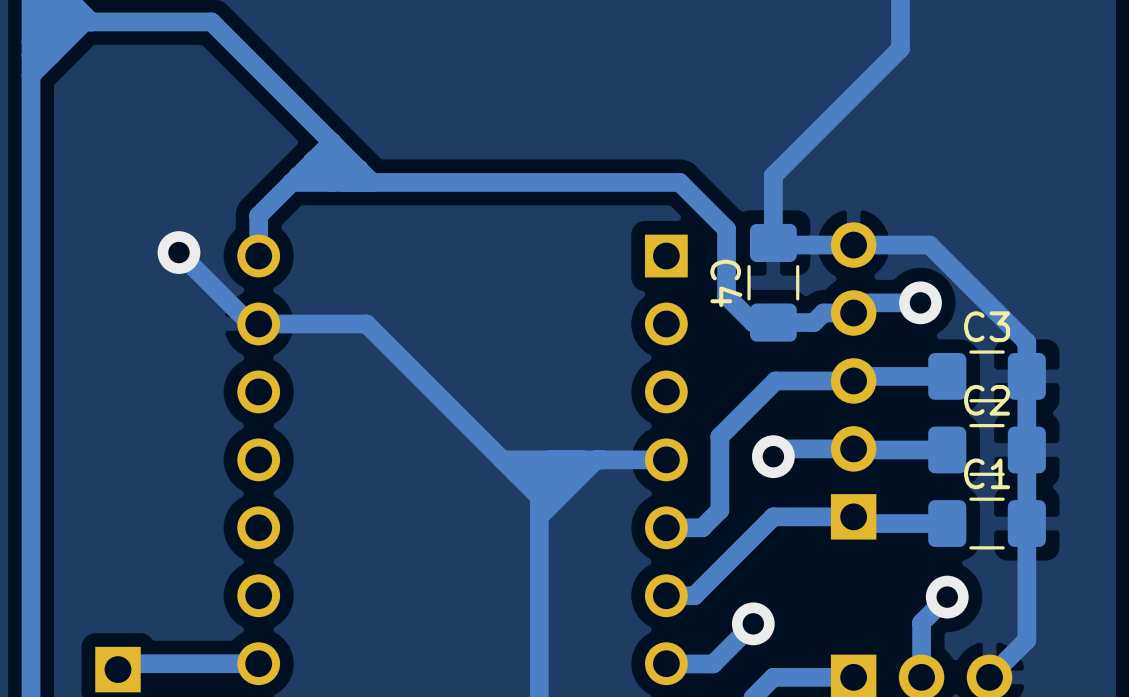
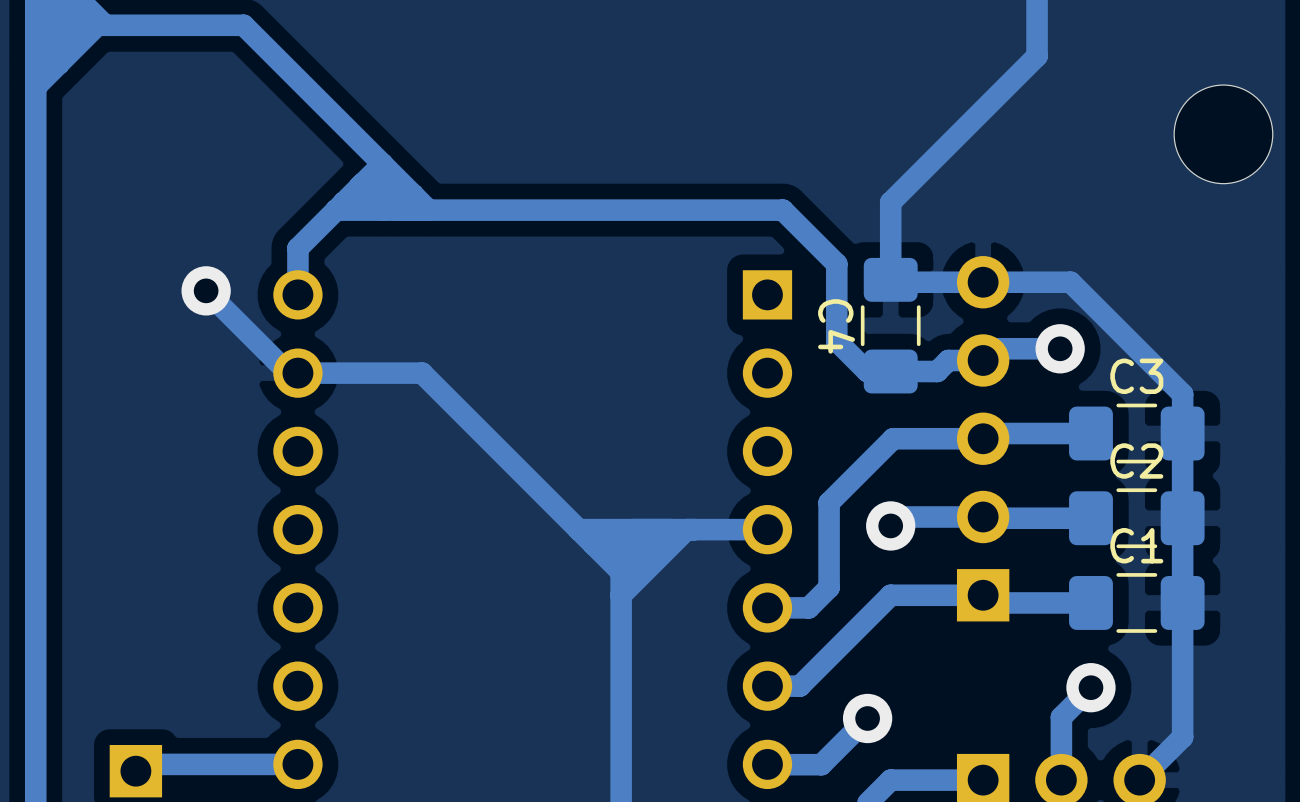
part: none -> (1223, 134)

